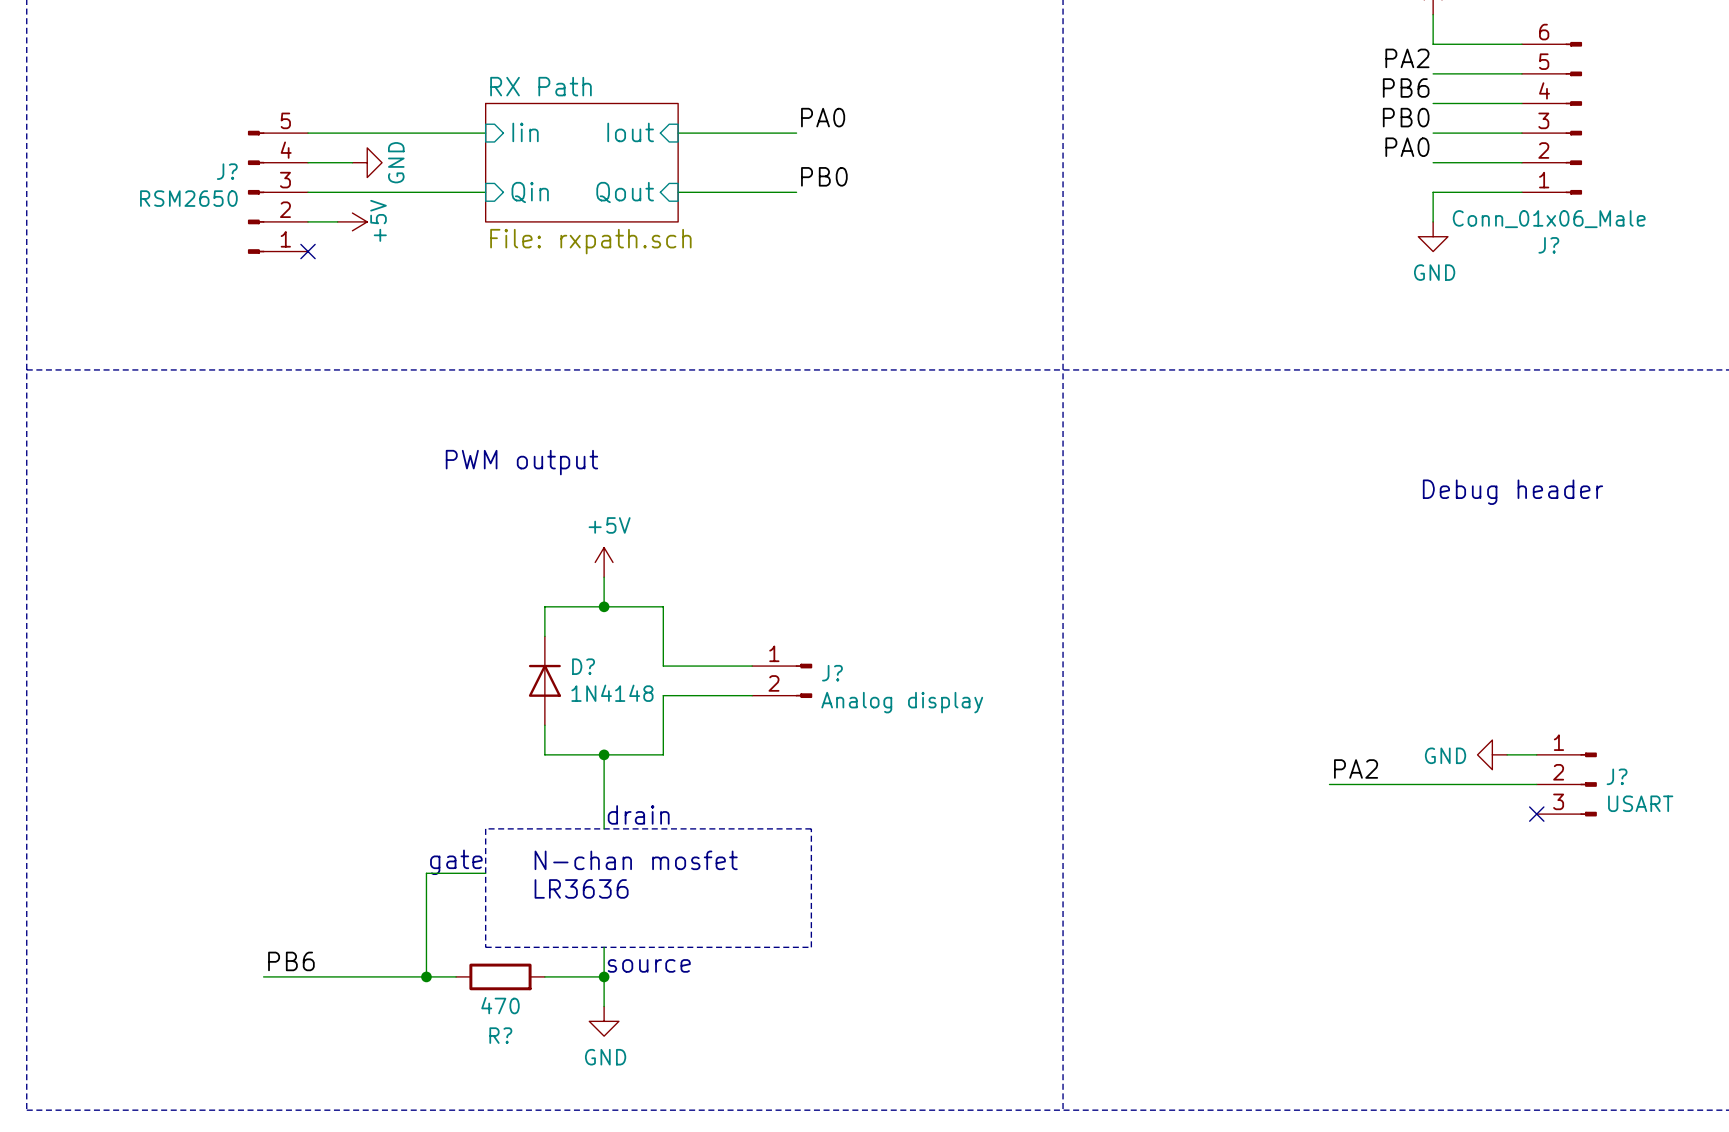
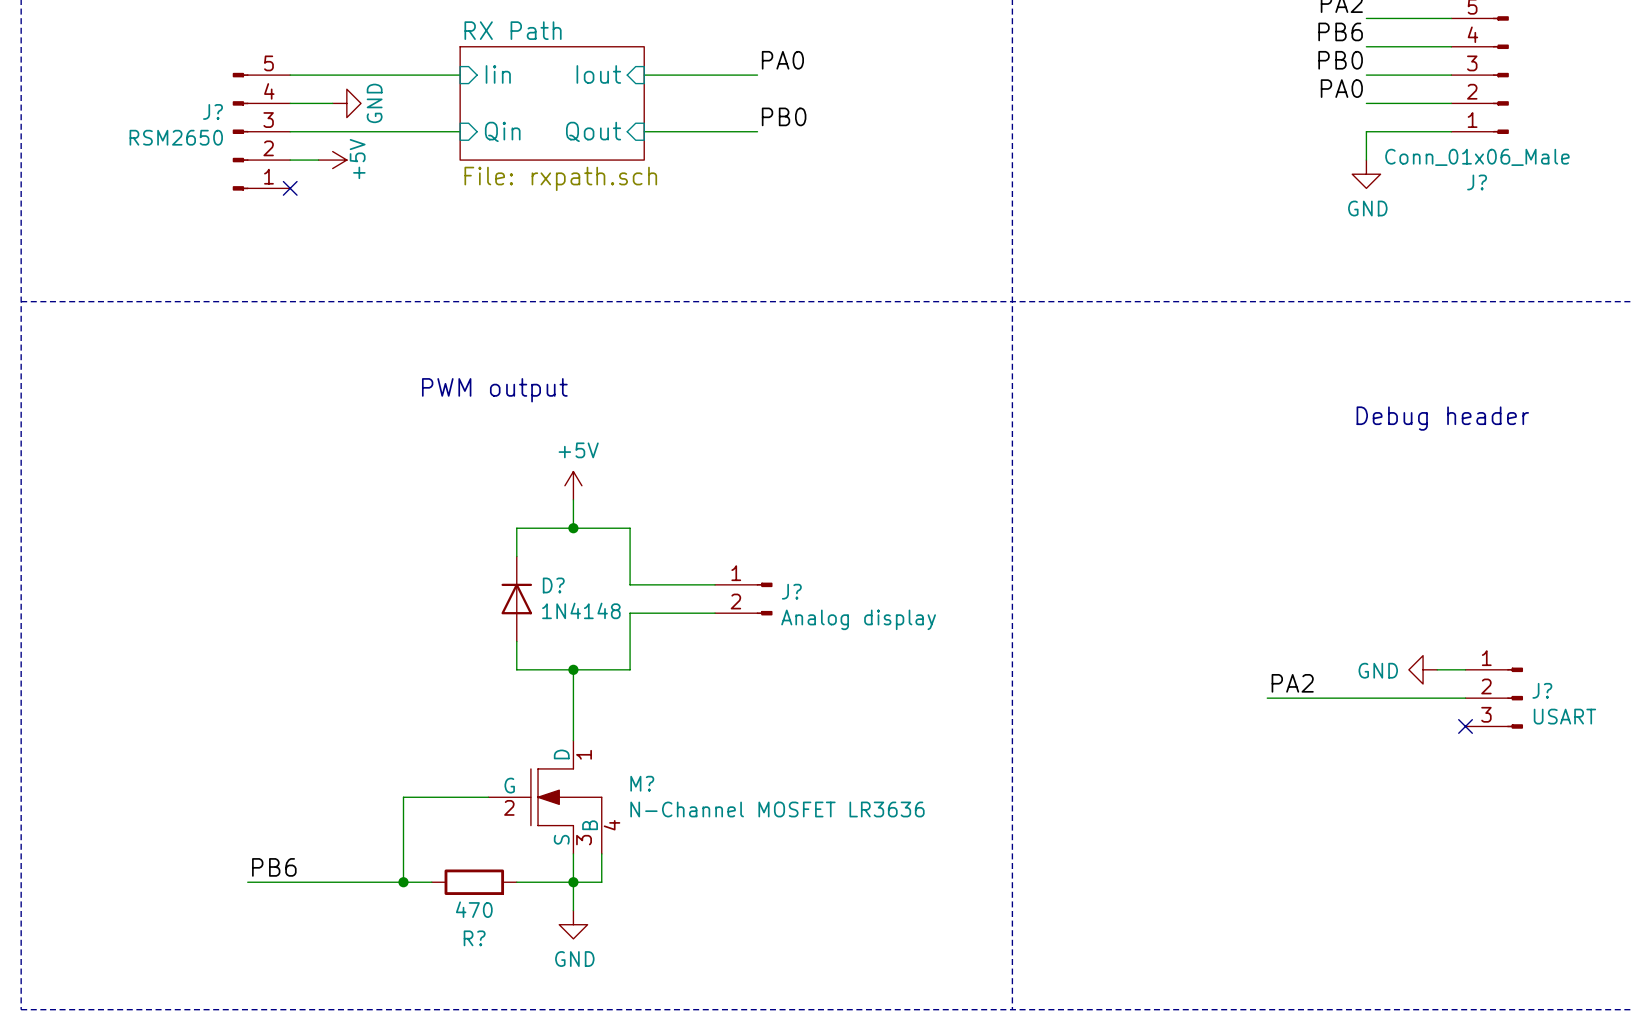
text: drain (638, 814) -> none
line: (485, 828) (485, 947) (811, 947) (811, 828) (485, 828) -> none
text: N-chan mosfet (636, 860) -> none
text: gate (456, 862) -> none
wire: (485, 873) (426, 873) (426, 888) -> (488, 797) (403, 797)
M?: none -> N-Channel MOSFET LR3636 (545, 797)
text: LR3636 (581, 888) -> none
wire: none -> (601, 853) (601, 882) (573, 882)
text: source (649, 965) -> none

